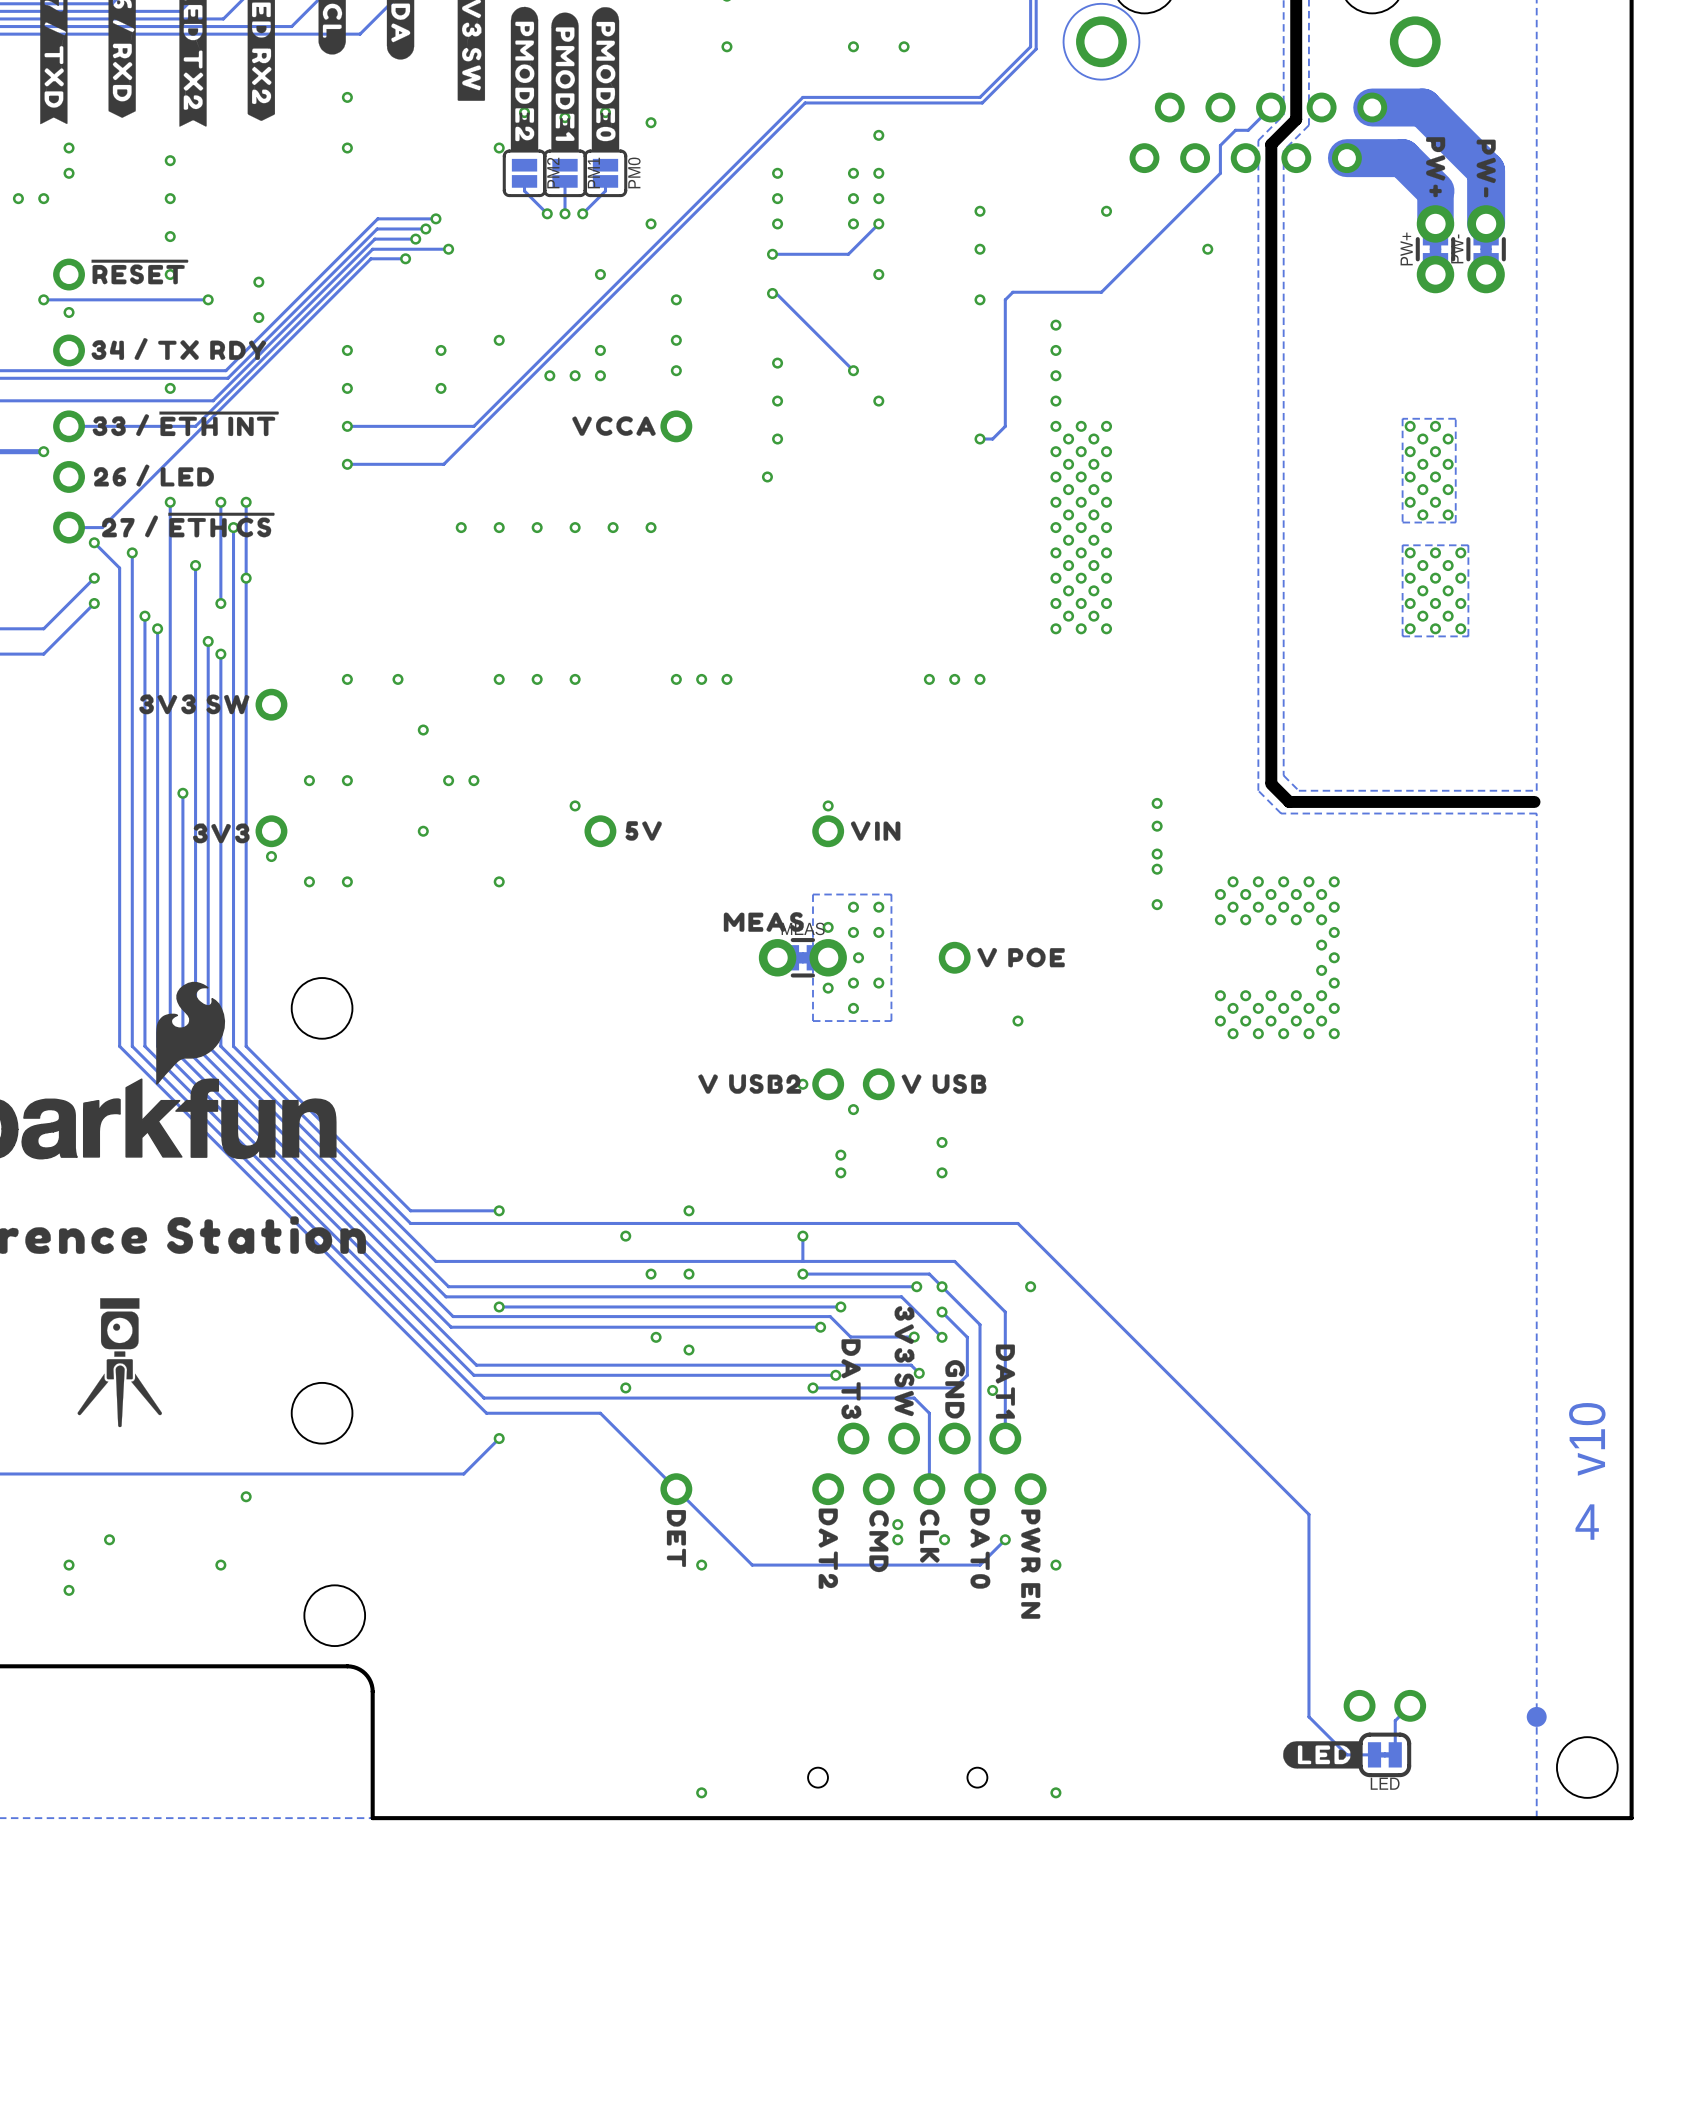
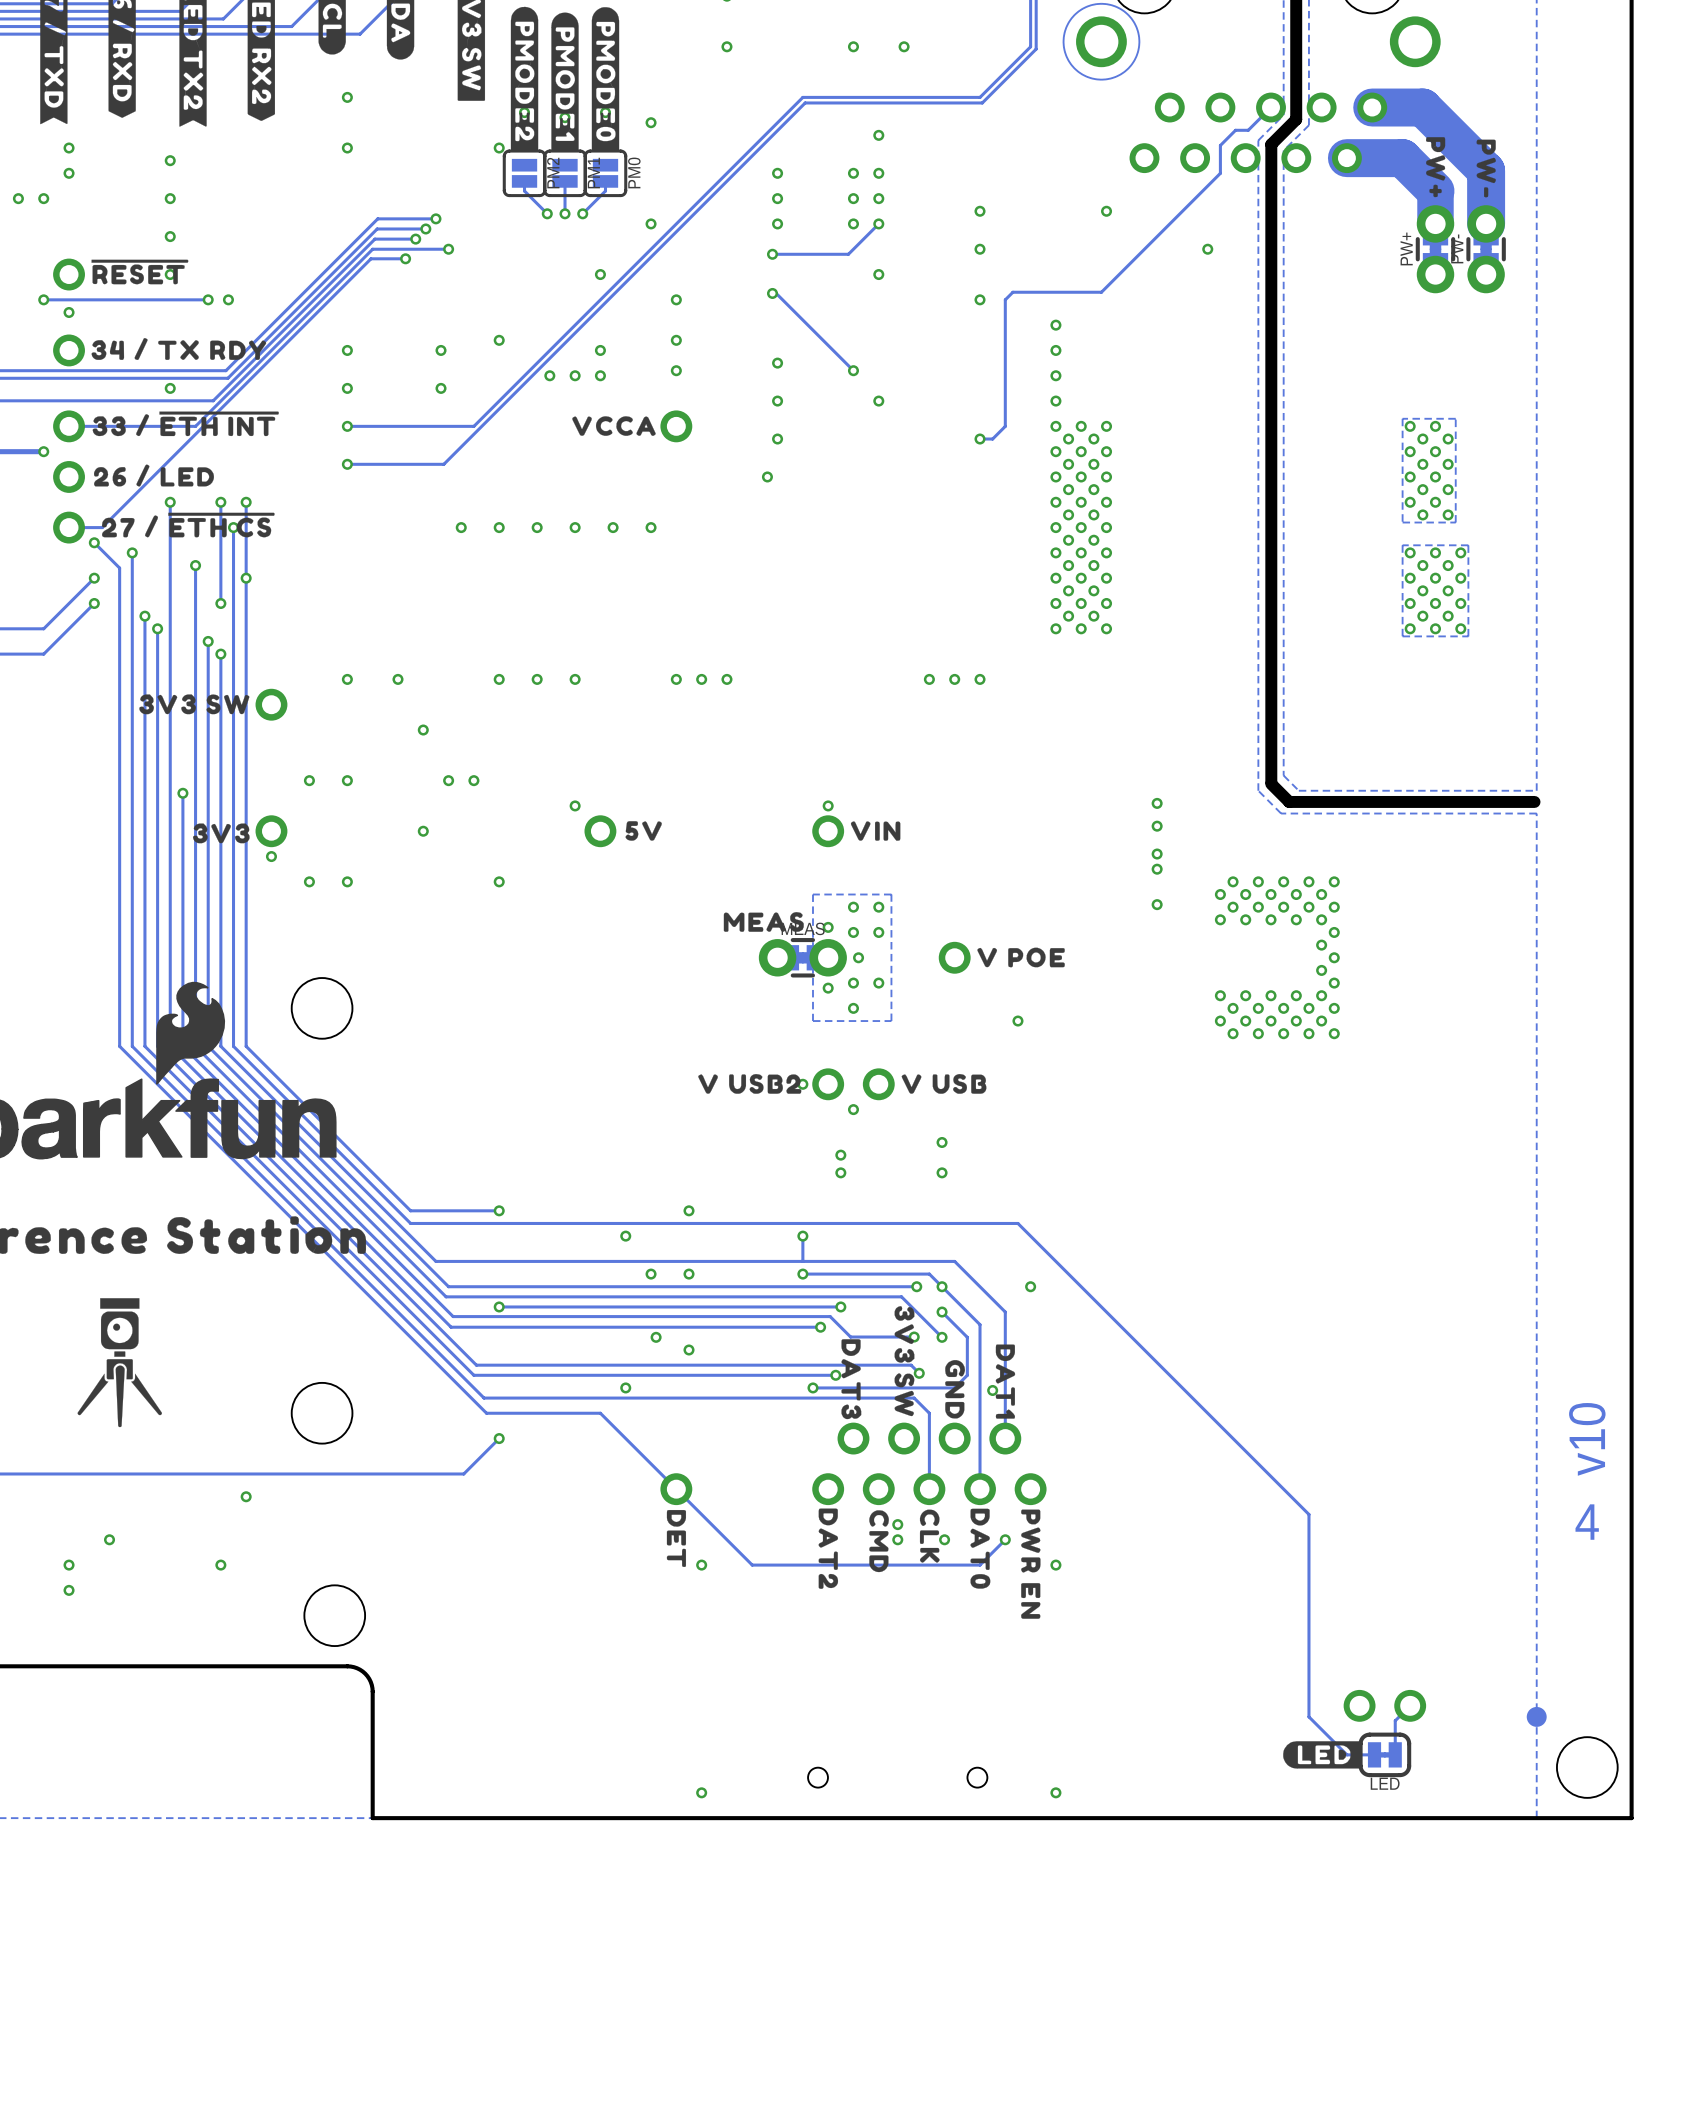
via: (258, 282) -> none
via: none -> (228, 299)
via: (258, 317) -> none

